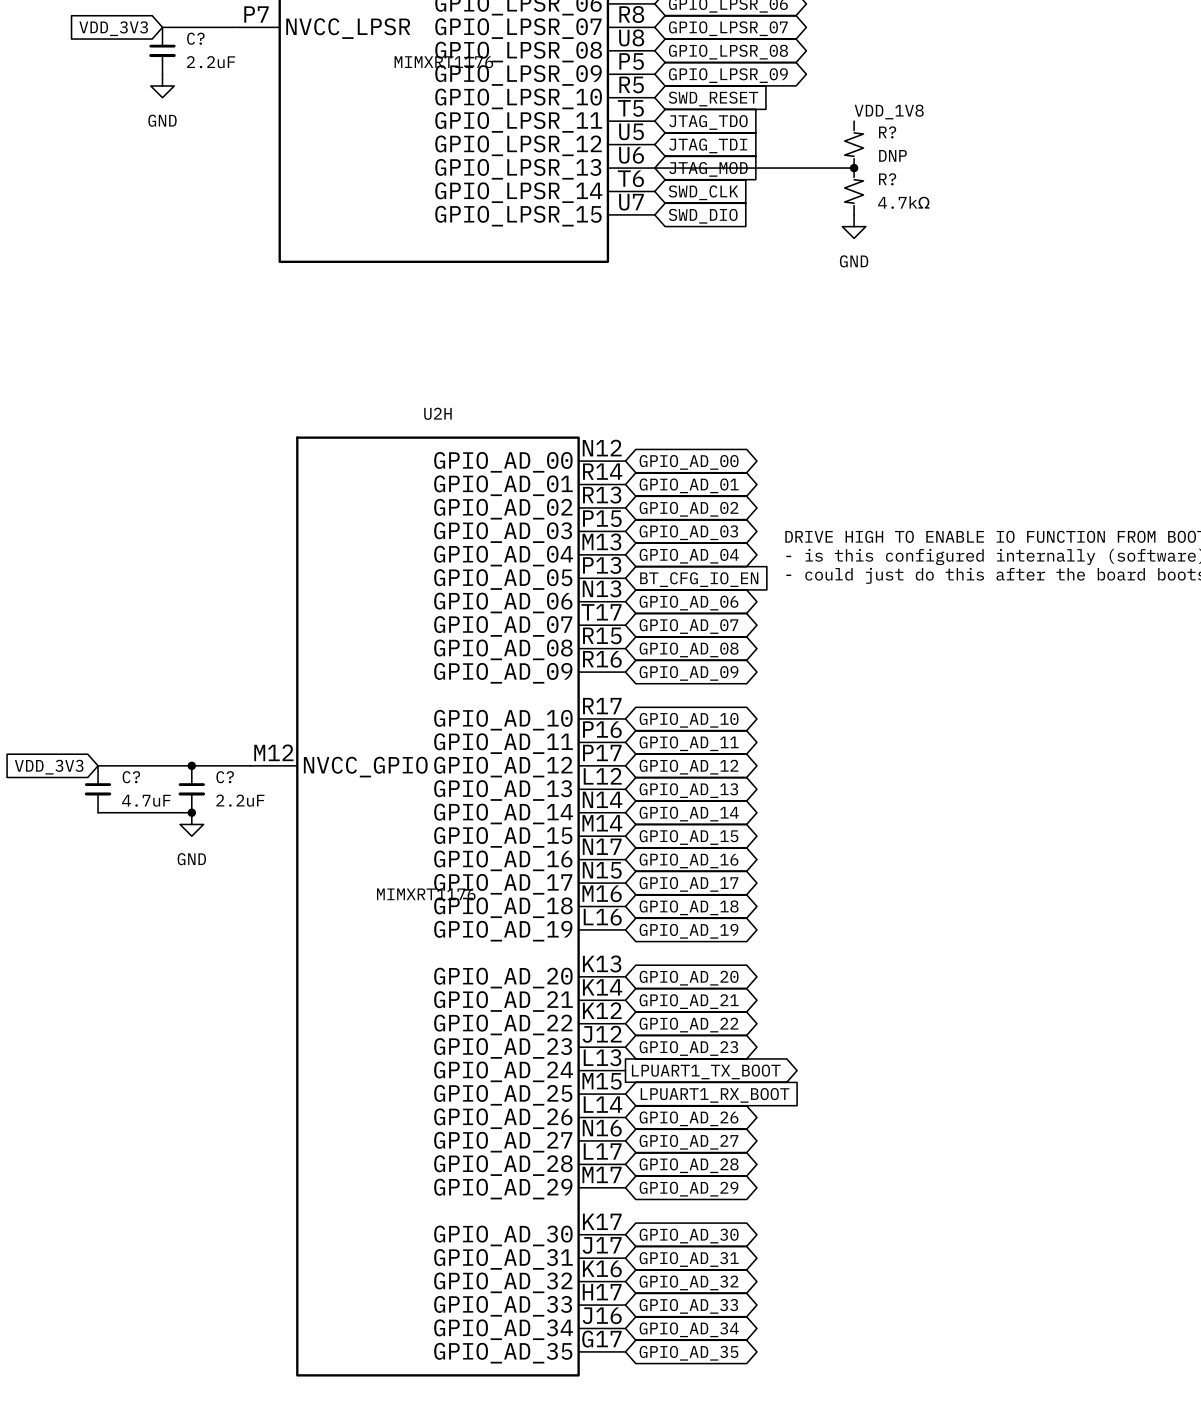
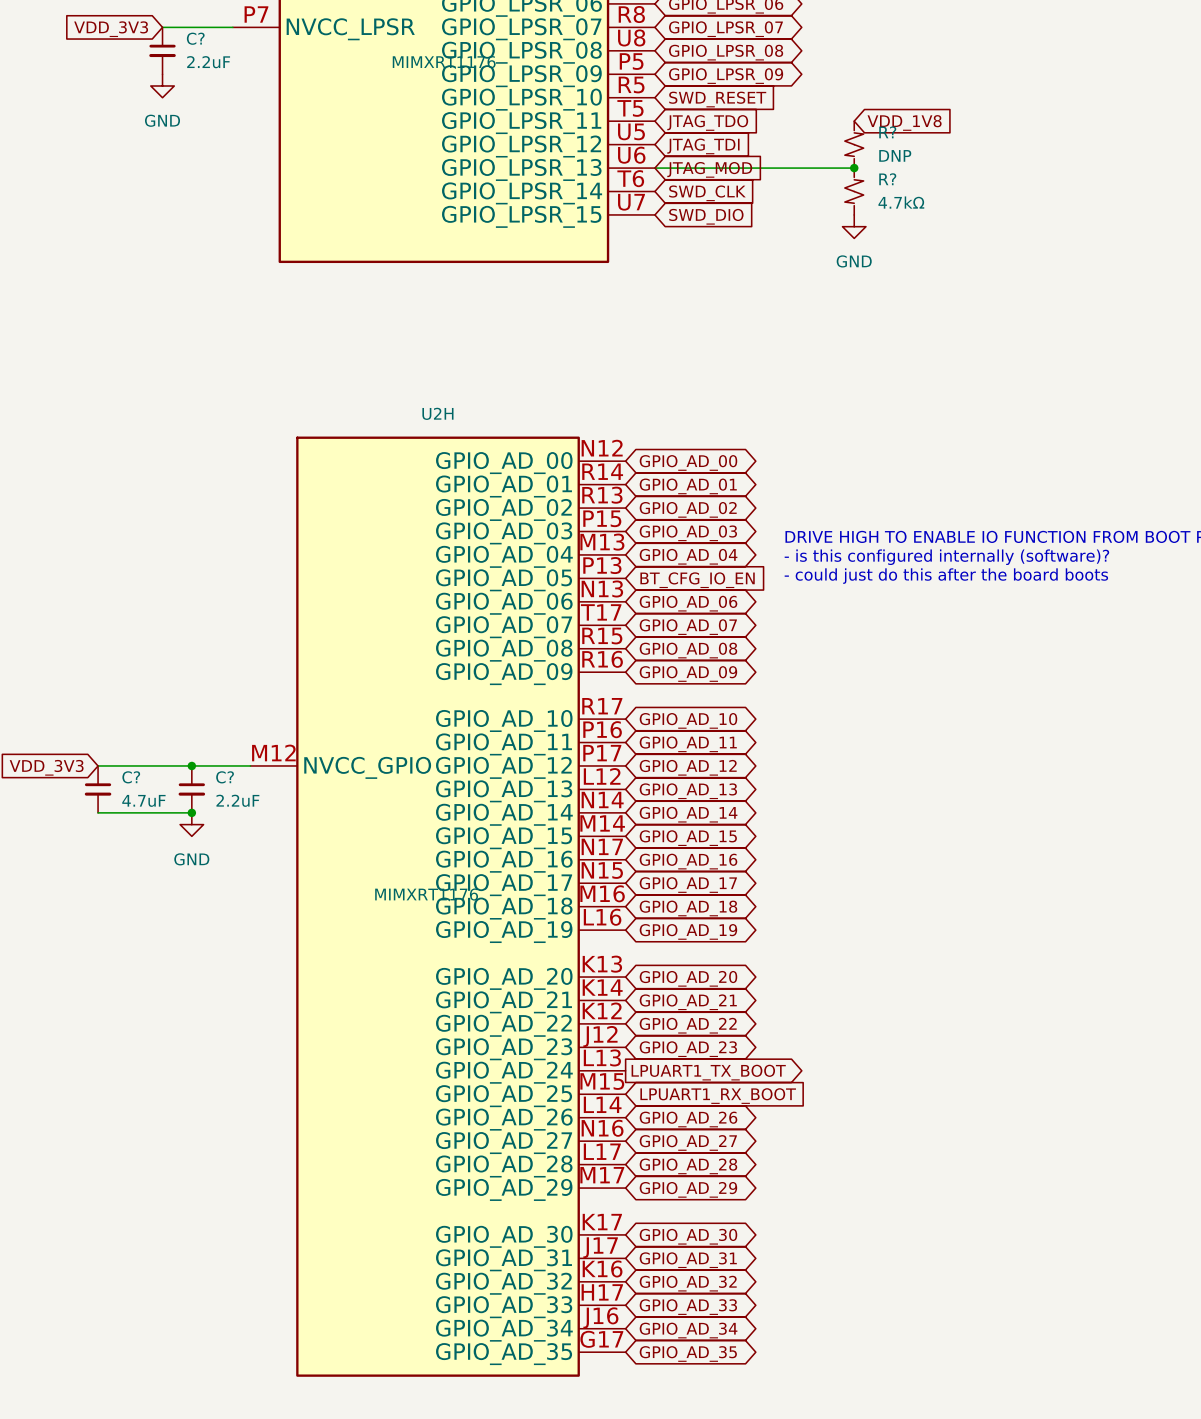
label: VDD_1V8 (889, 112) -> none
global label: none -> VDD_1V8 (904, 122)

